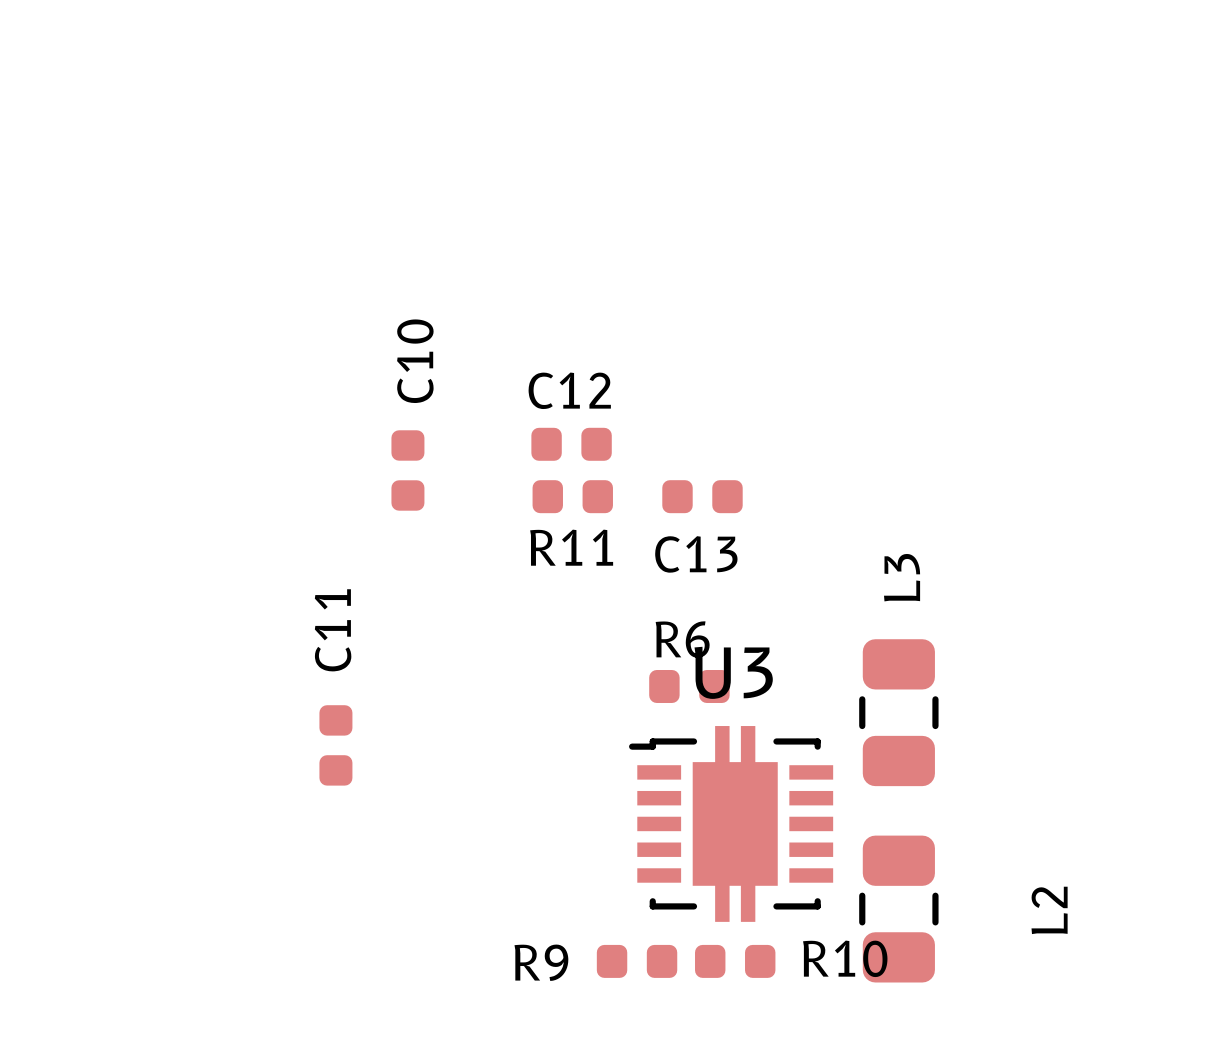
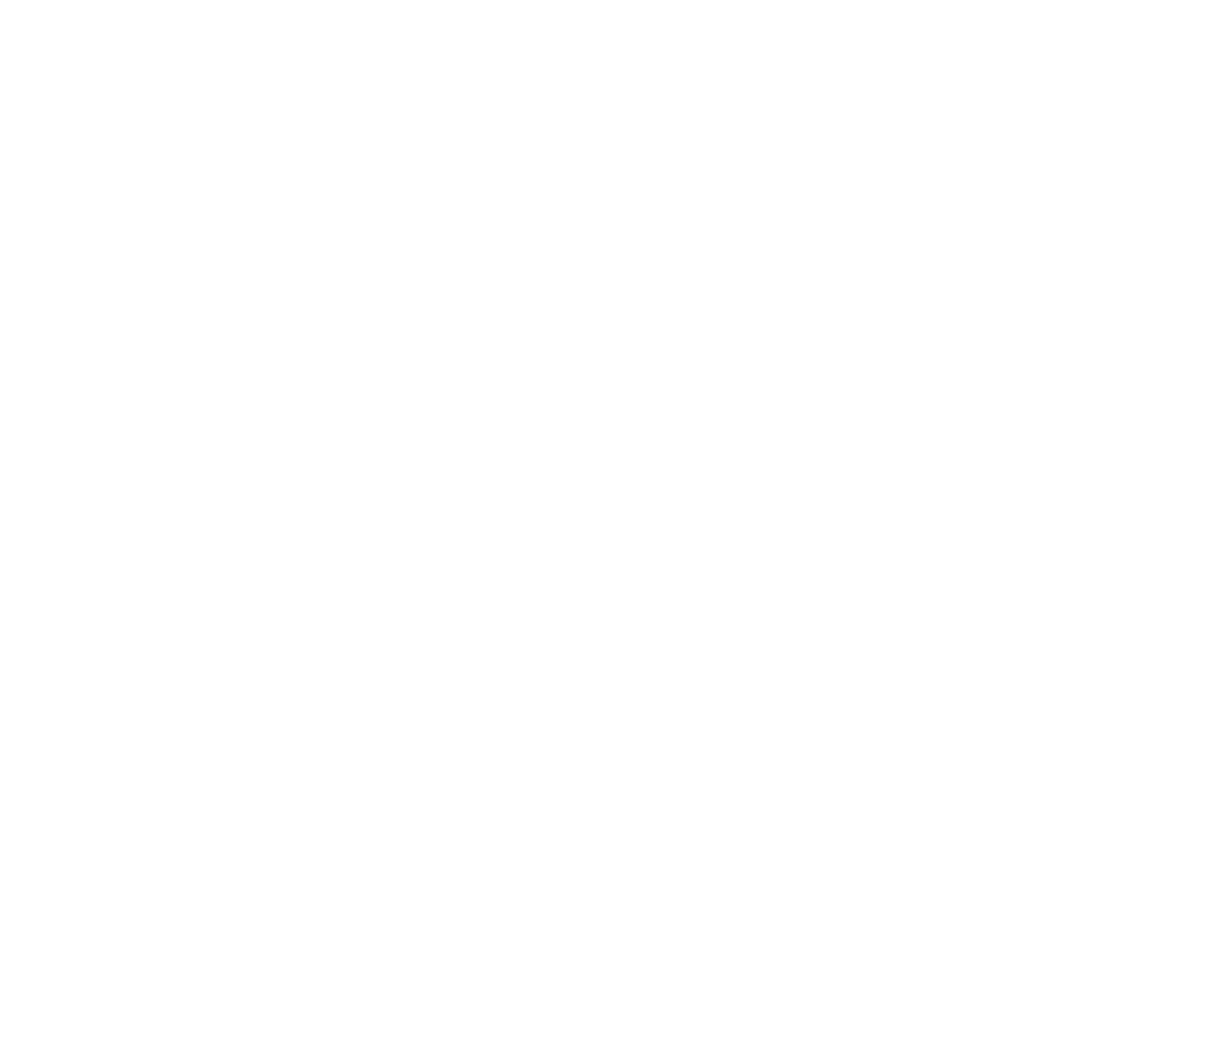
C12: (571, 444) -> none
C10: (407, 470) -> none
R11: (572, 496) -> none
C13: (702, 496) -> none
R6: (689, 686) -> none
L3: (898, 712) -> none
C11: (335, 745) -> none
U3: (731, 823) -> none
L2: (898, 909) -> none
R9: (637, 961) -> none
R10: (735, 961) -> none

